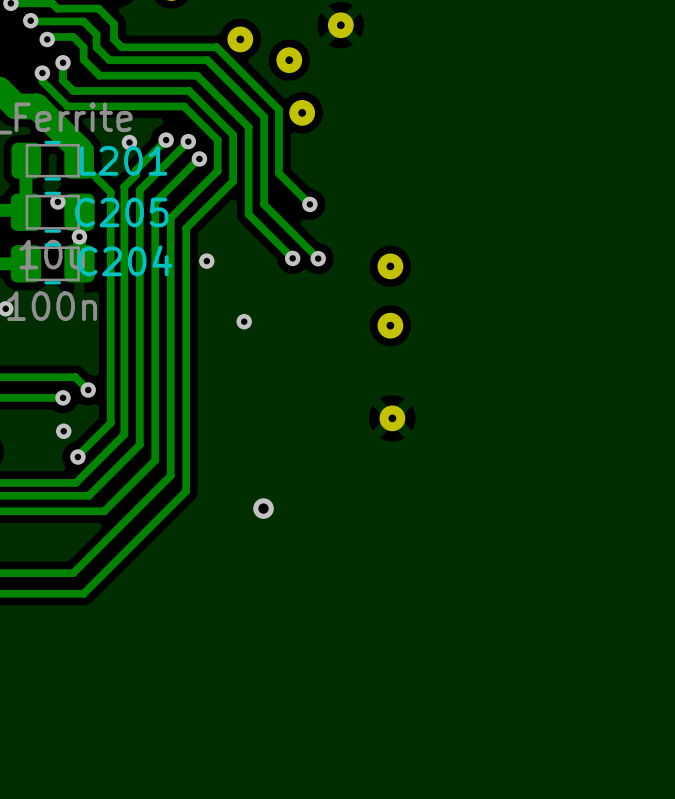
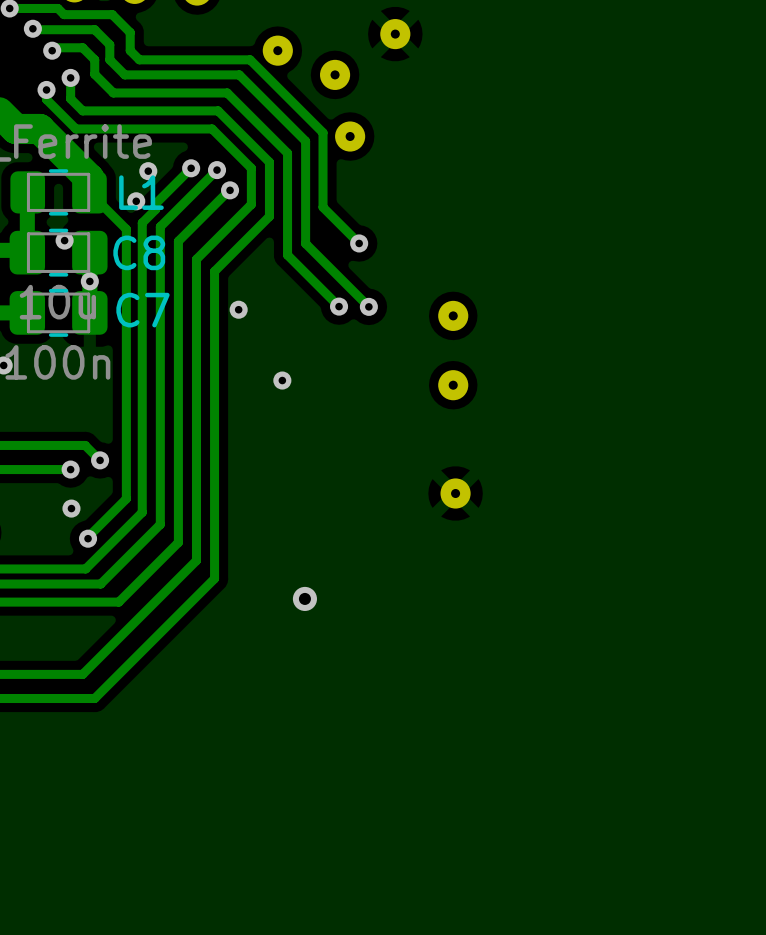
L201 name: L201 (123, 160) -> L1 (141, 192)
via: none -> (136, 201)
C205 name: C205 (121, 212) -> C8 (139, 252)
C204 name: C204 (124, 260) -> C7 (142, 310)

